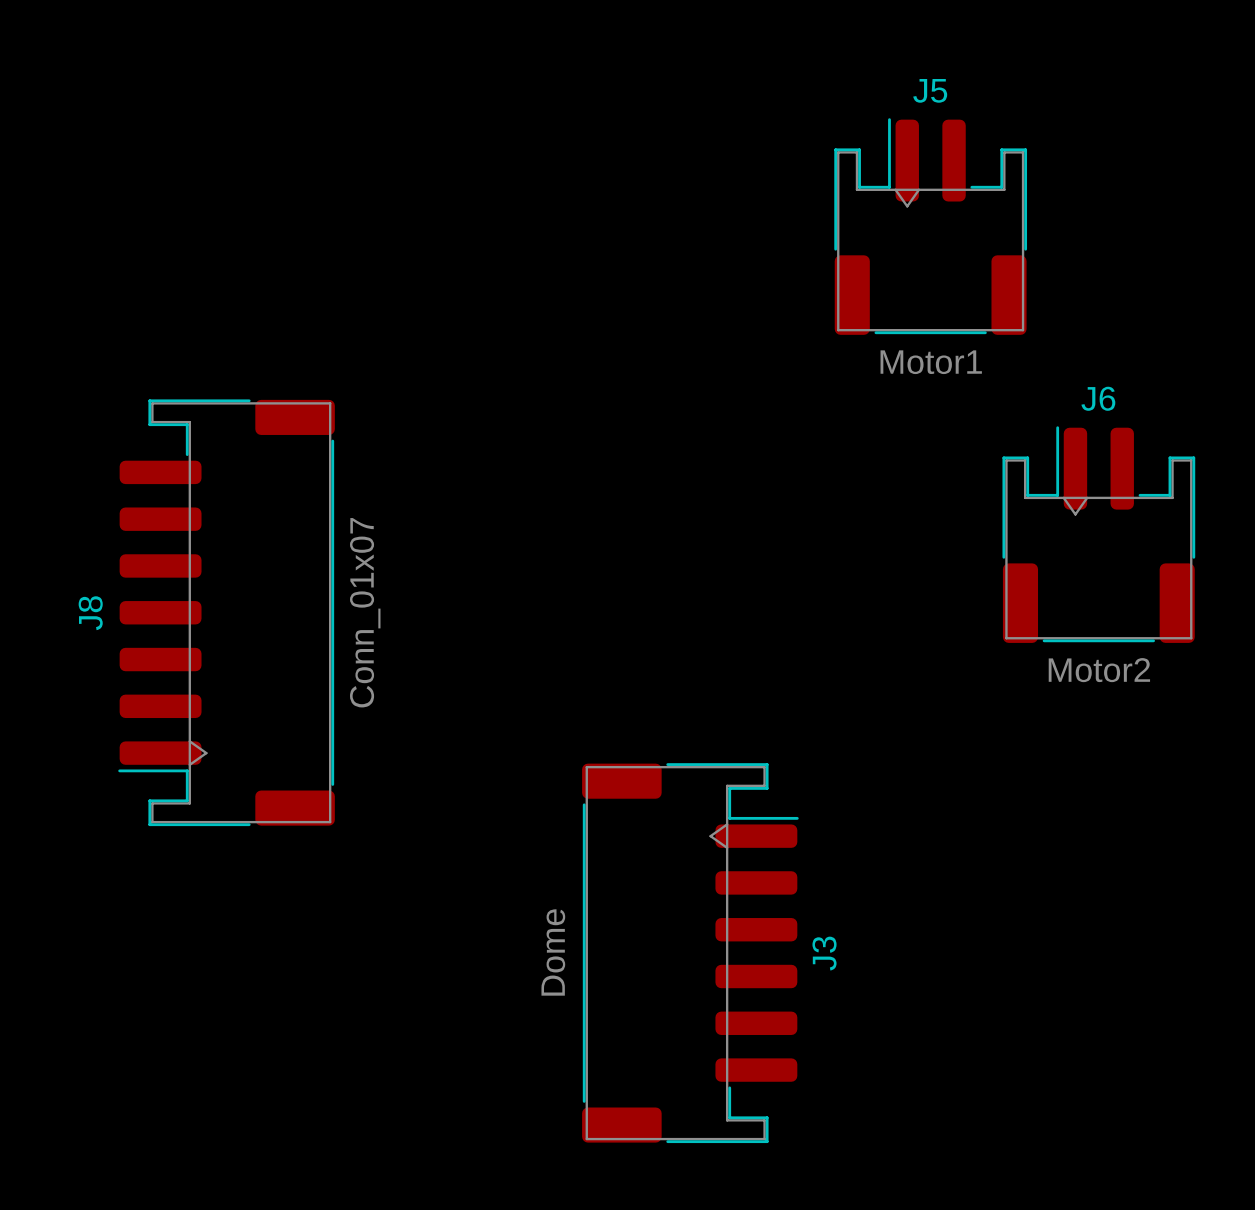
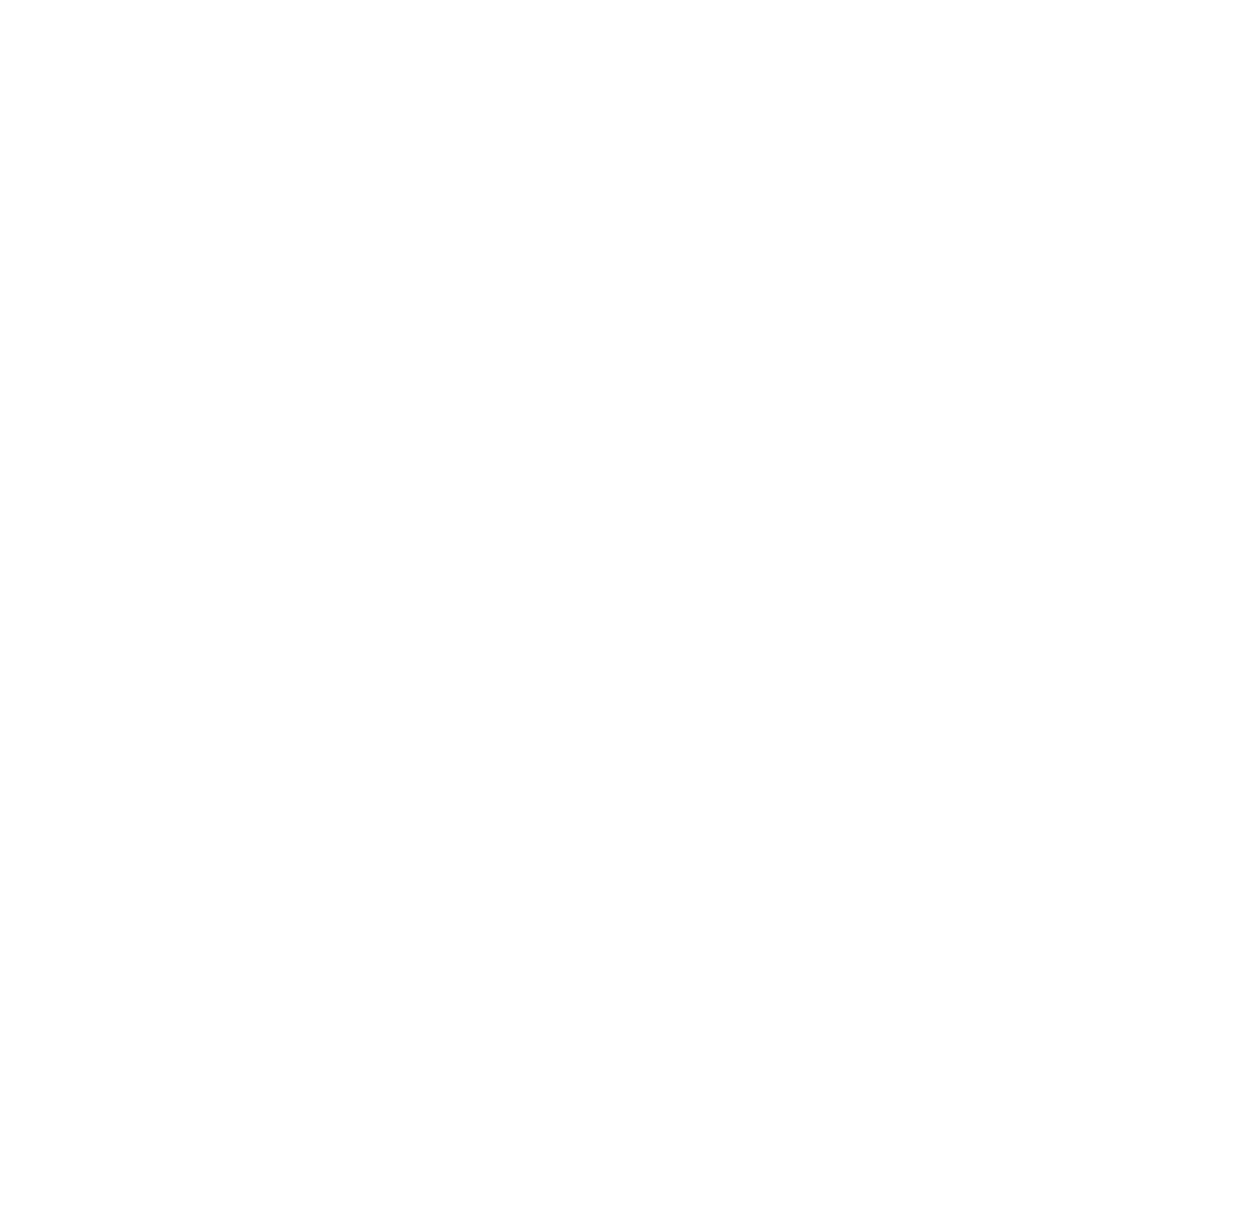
J5: Motor1 (930, 226) -> none
J6: Motor2 (1098, 534) -> none
J8: Conn_01x07 (226, 612) -> none
J3: Dome (690, 953) -> none

